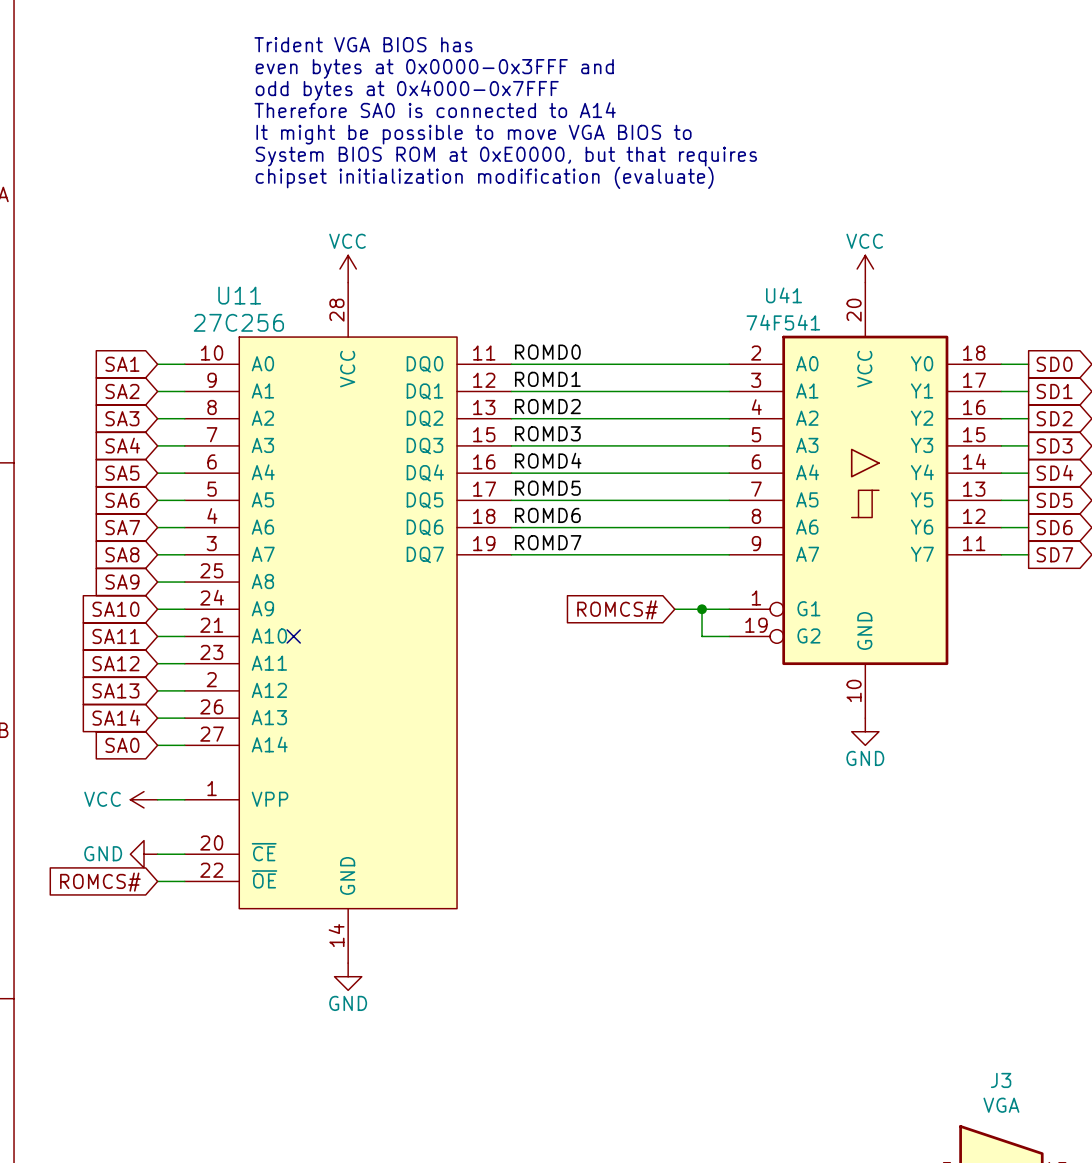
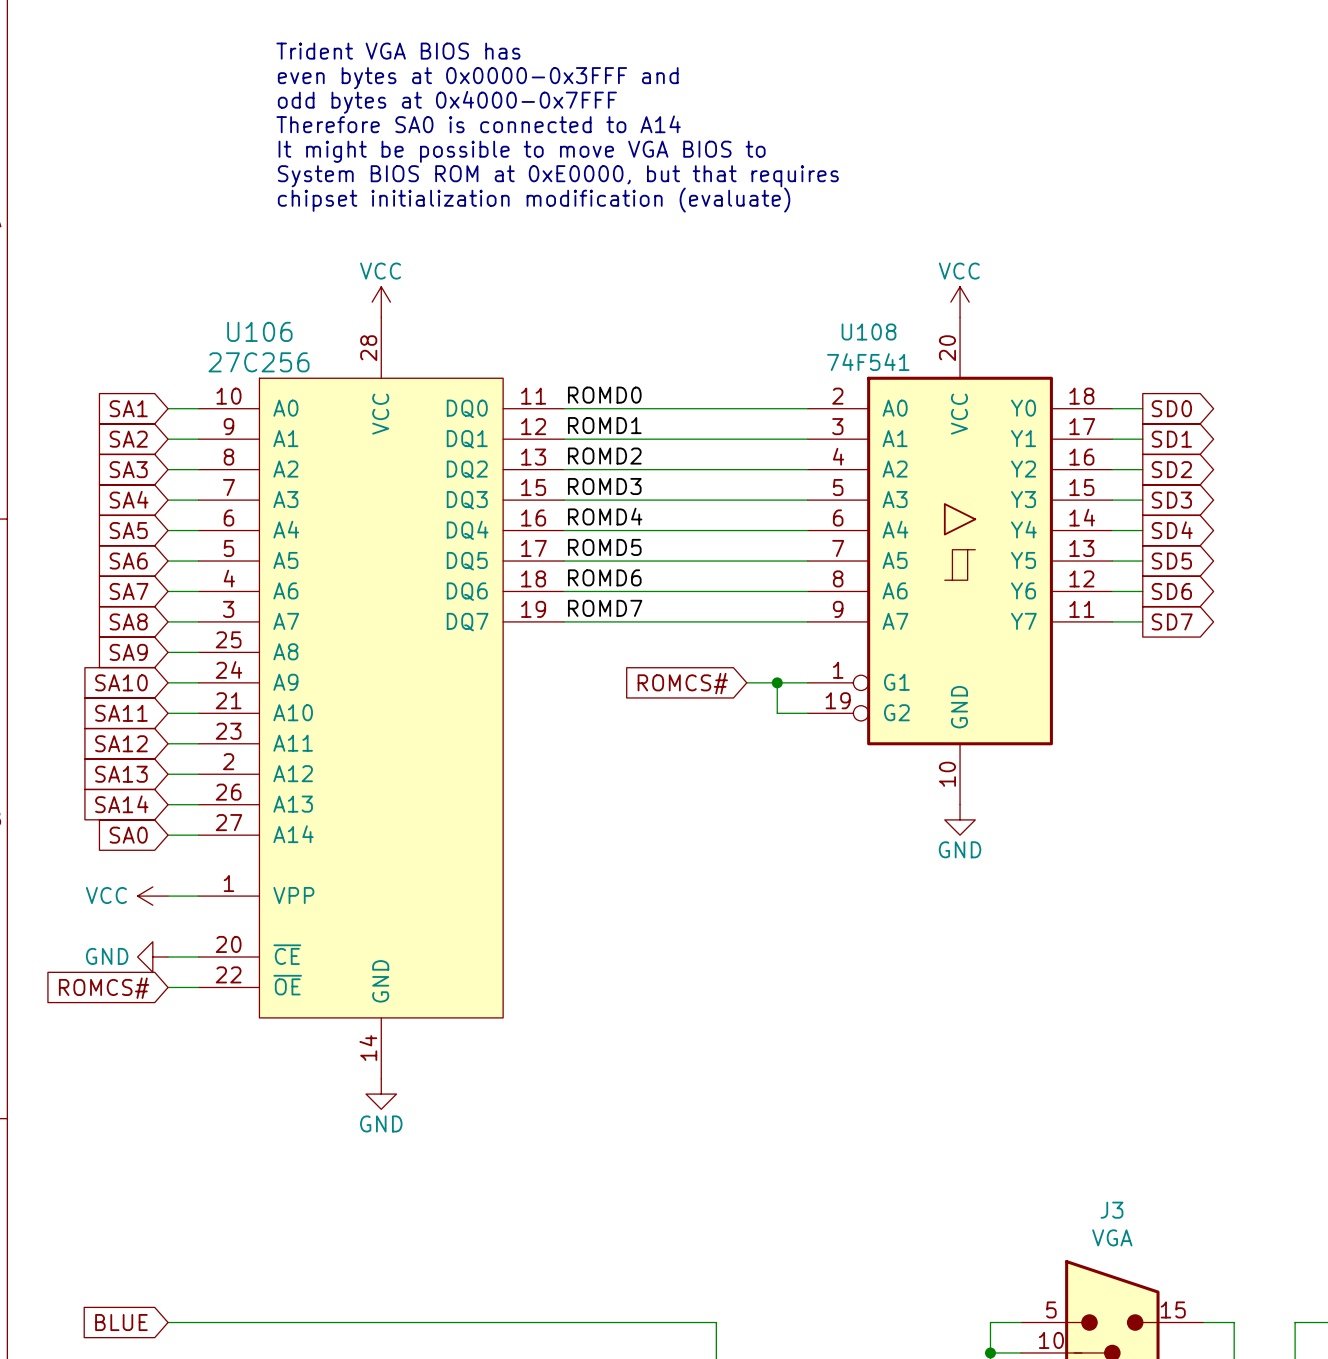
U11 name: U11 (239, 295) -> U106 (259, 331)
U41 name: U41 (783, 295) -> U108 (869, 331)
no-connect mark: (293, 636) -> none

